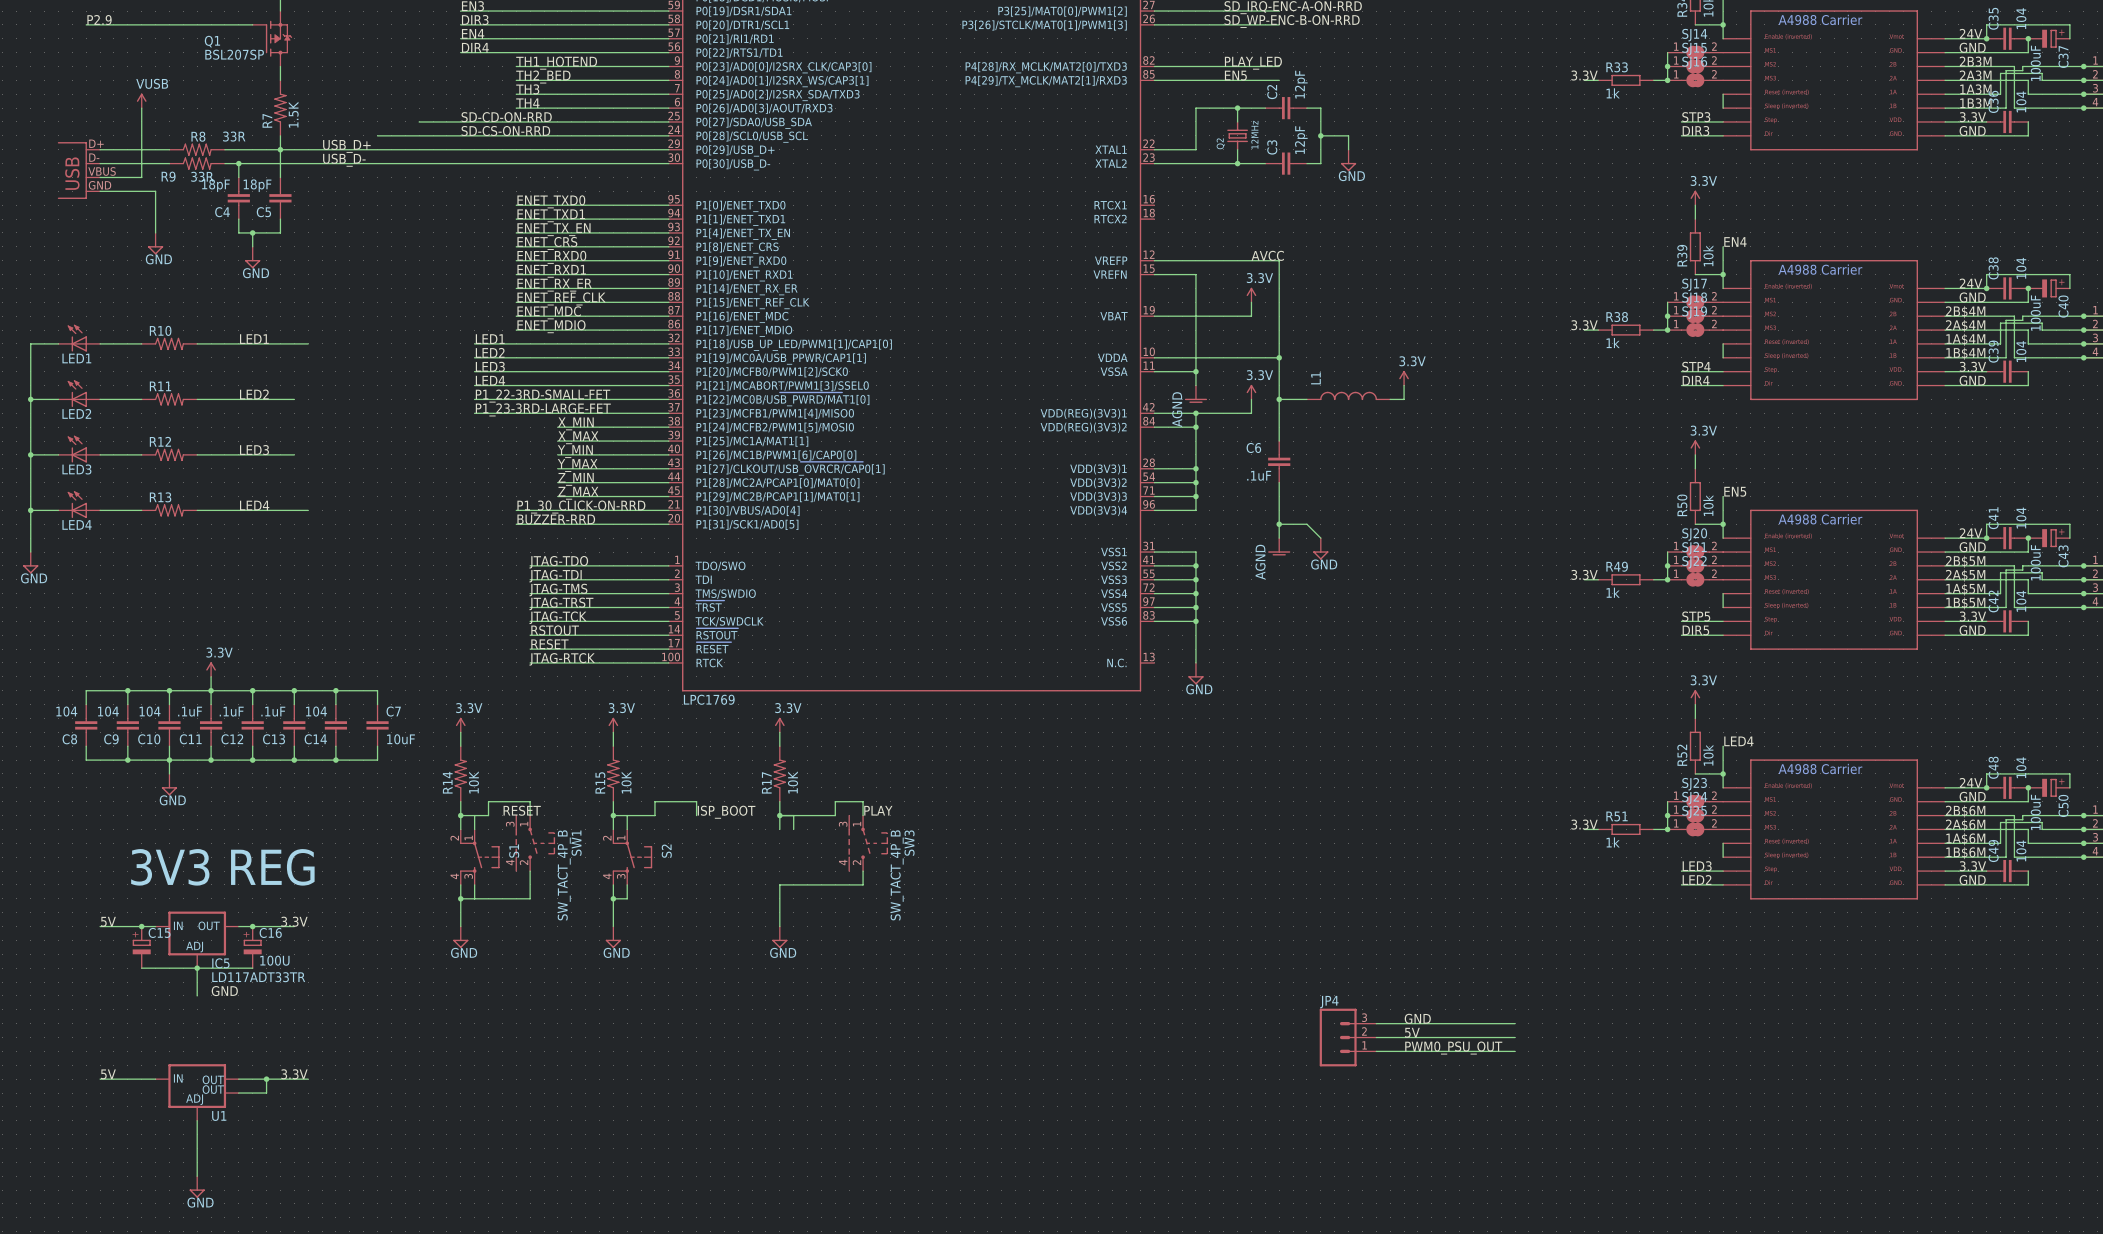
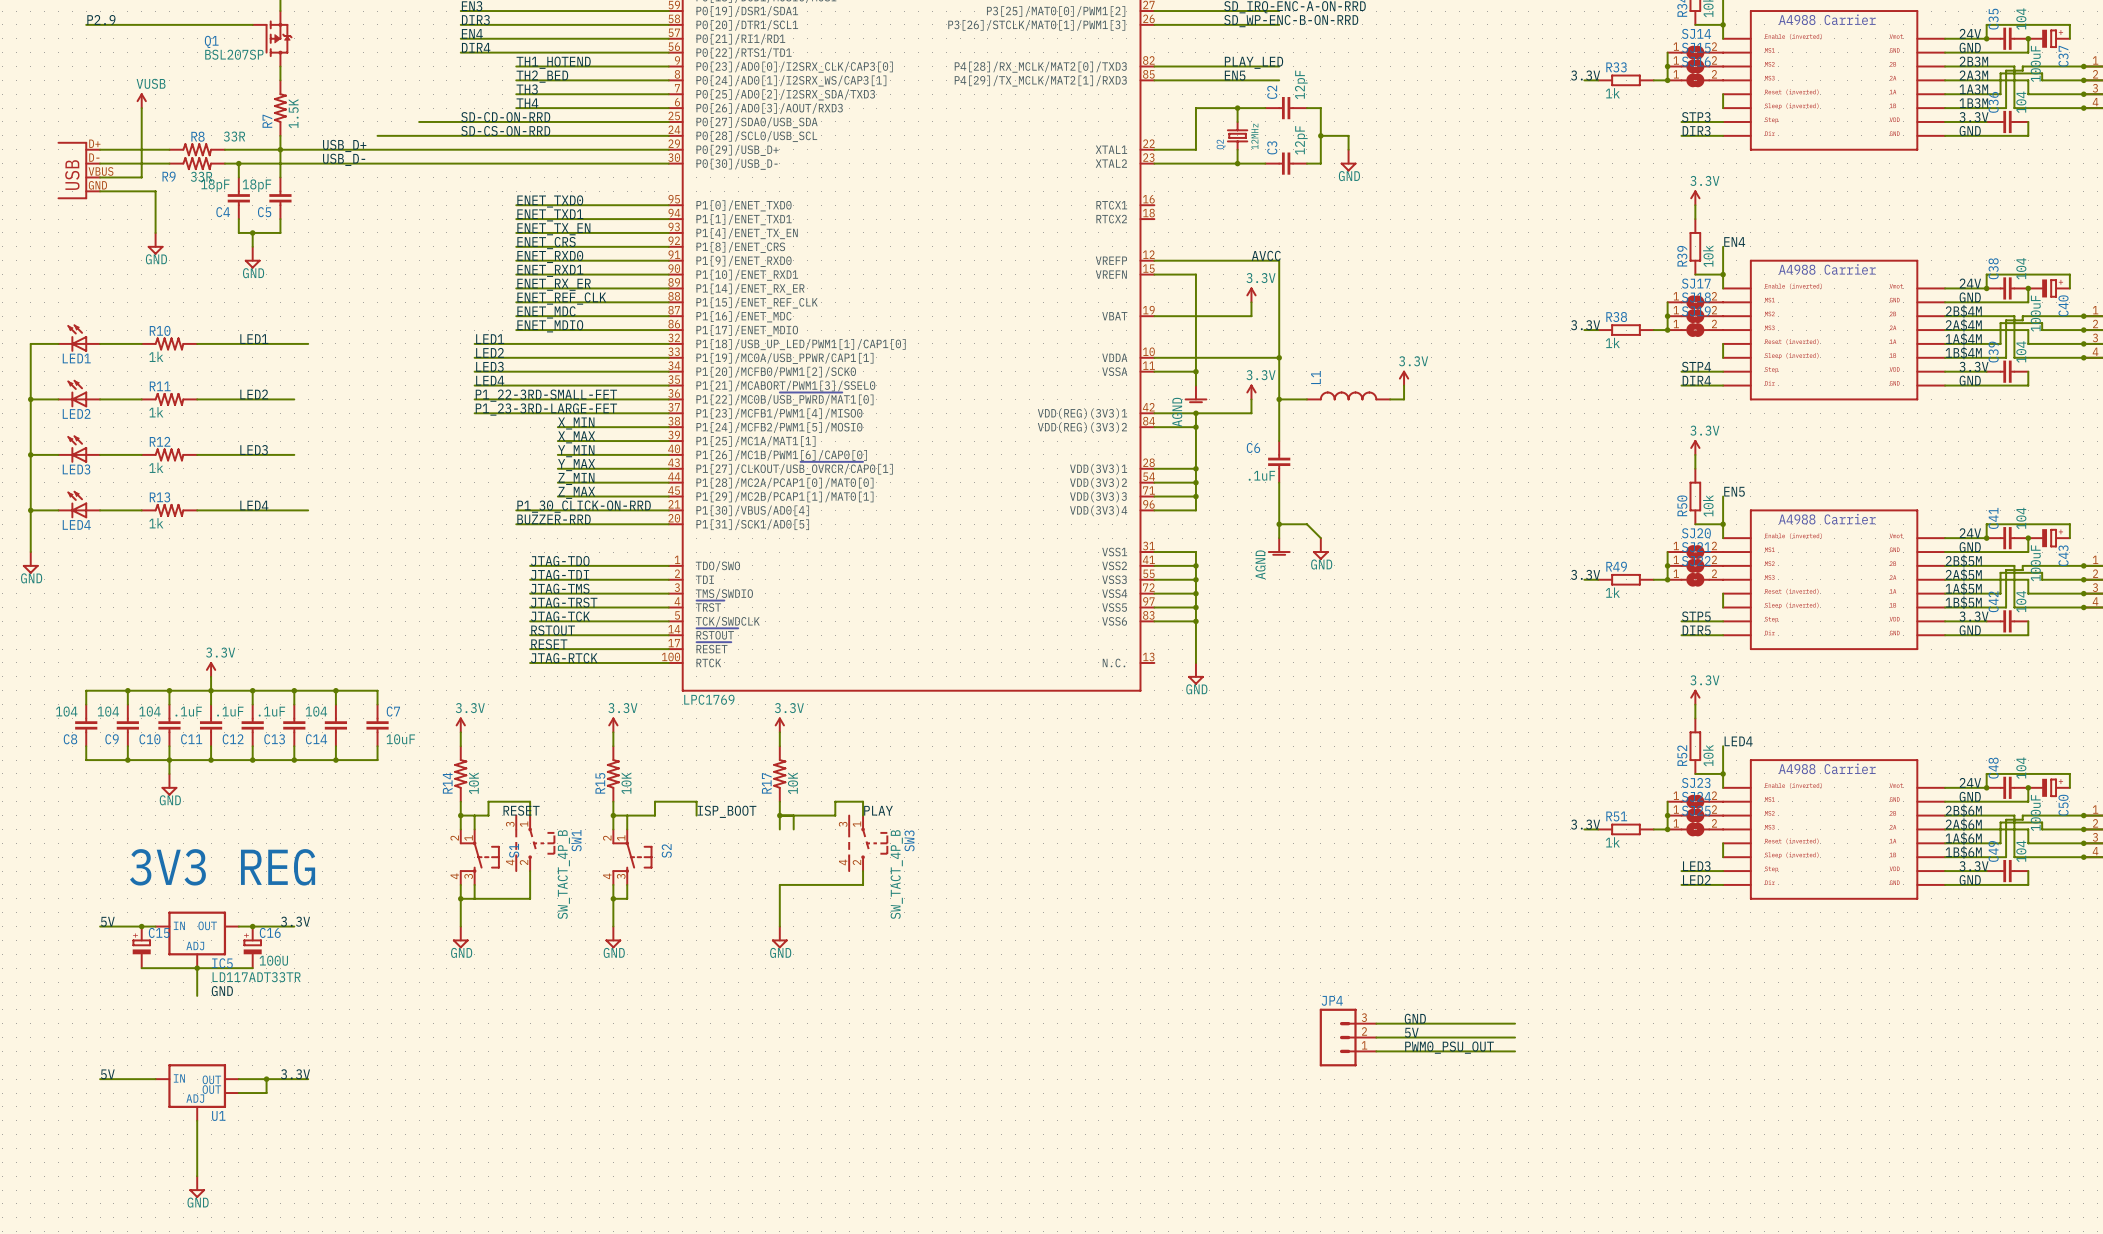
R10 value: none -> 1k (156, 356)
R11 value: none -> 1k (156, 412)
R12 value: none -> 1k (156, 467)
R13 value: none -> 1k (156, 523)

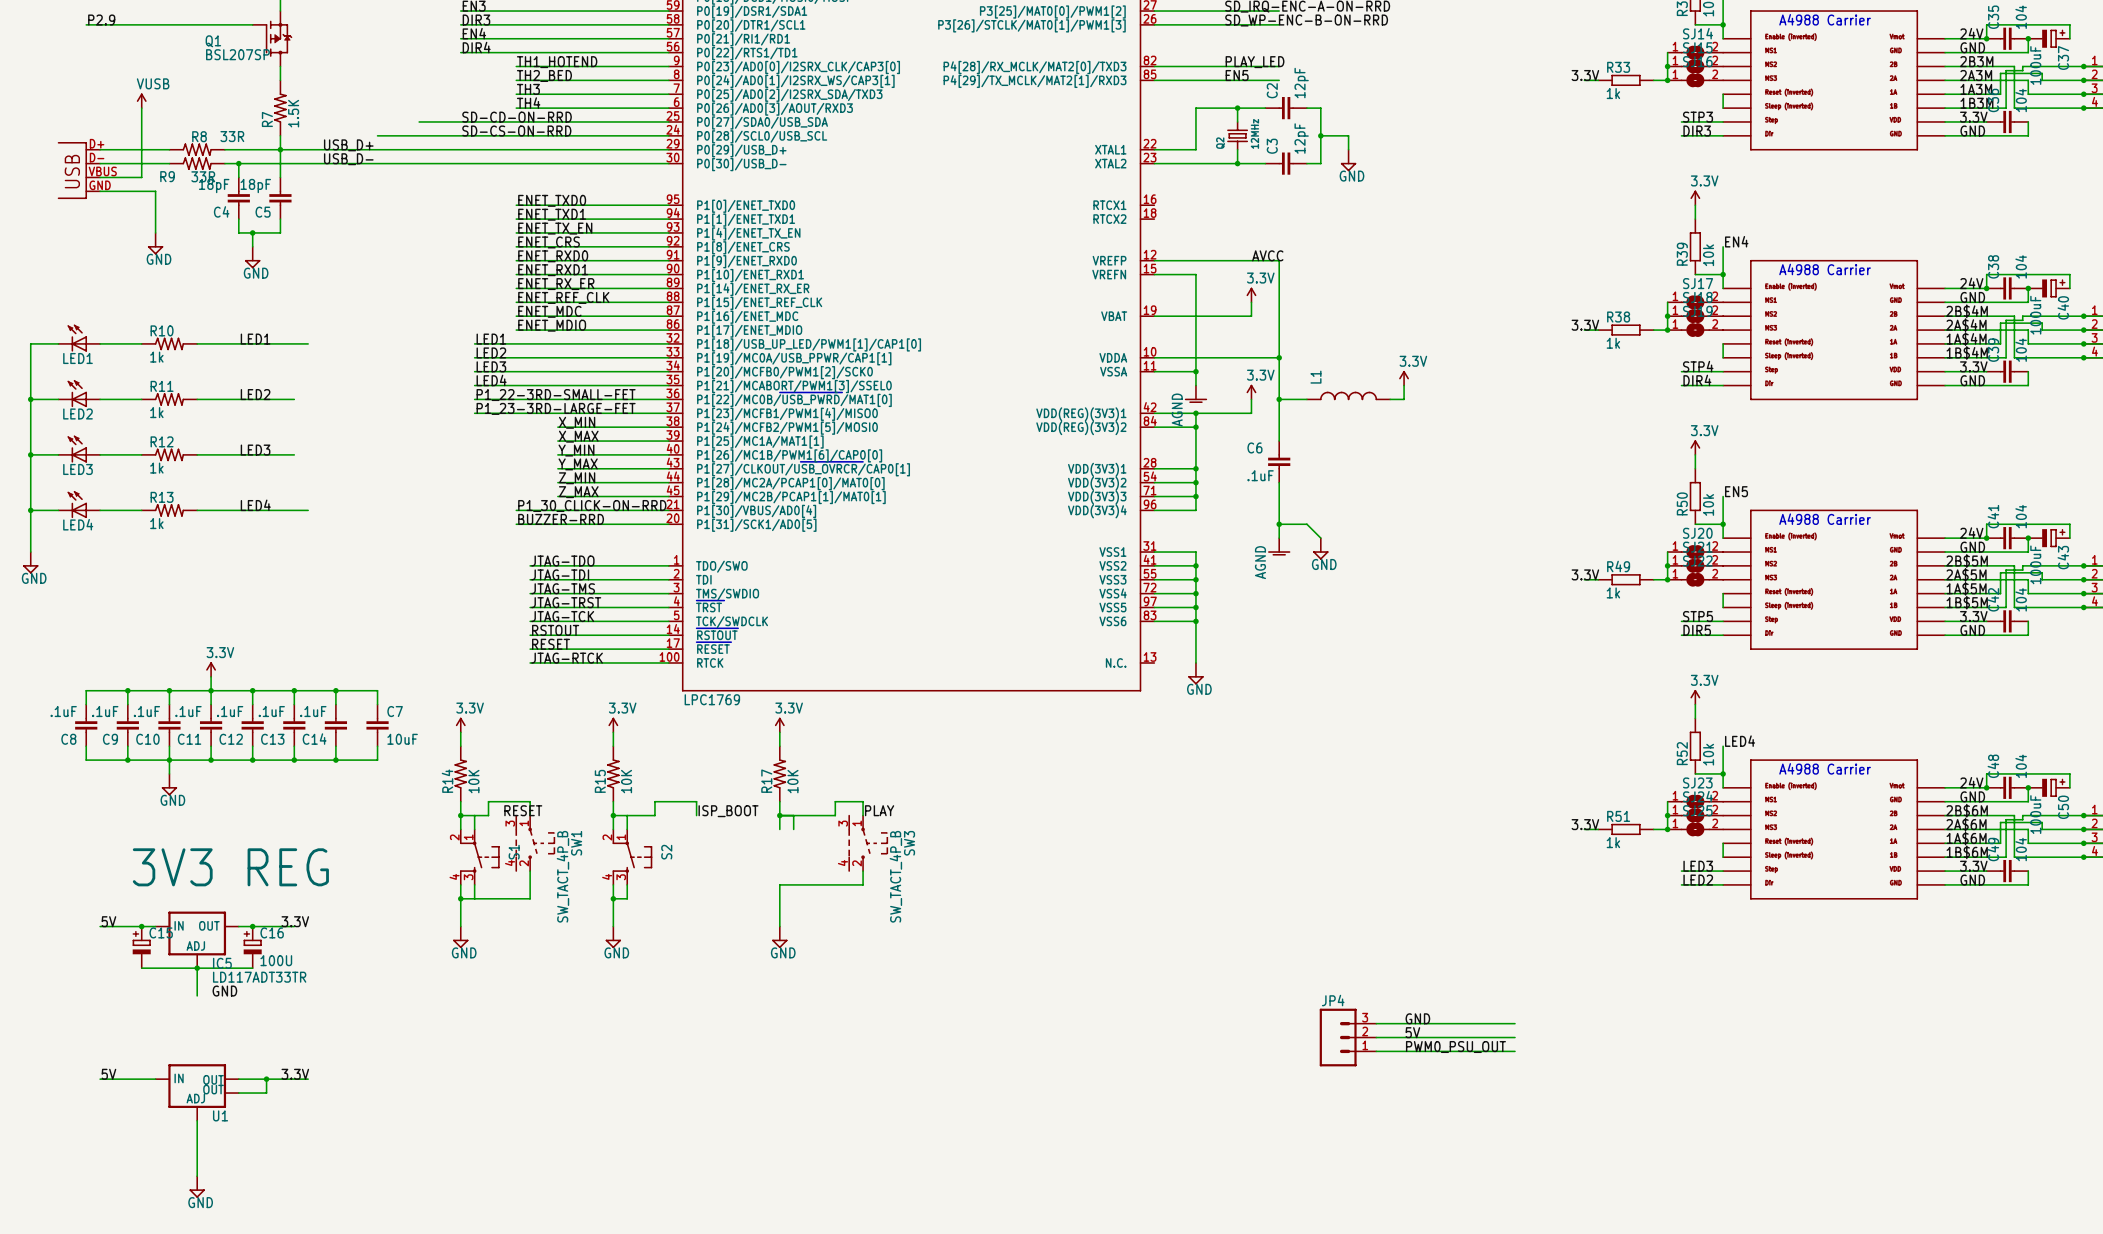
C8 value: 104 (66, 711) -> .1uF (63, 711)
C9 value: 104 (108, 711) -> .1uF (105, 711)
C10 value: 104 (149, 711) -> .1uF (146, 711)
C14 value: 104 (316, 711) -> .1uF (313, 711)

